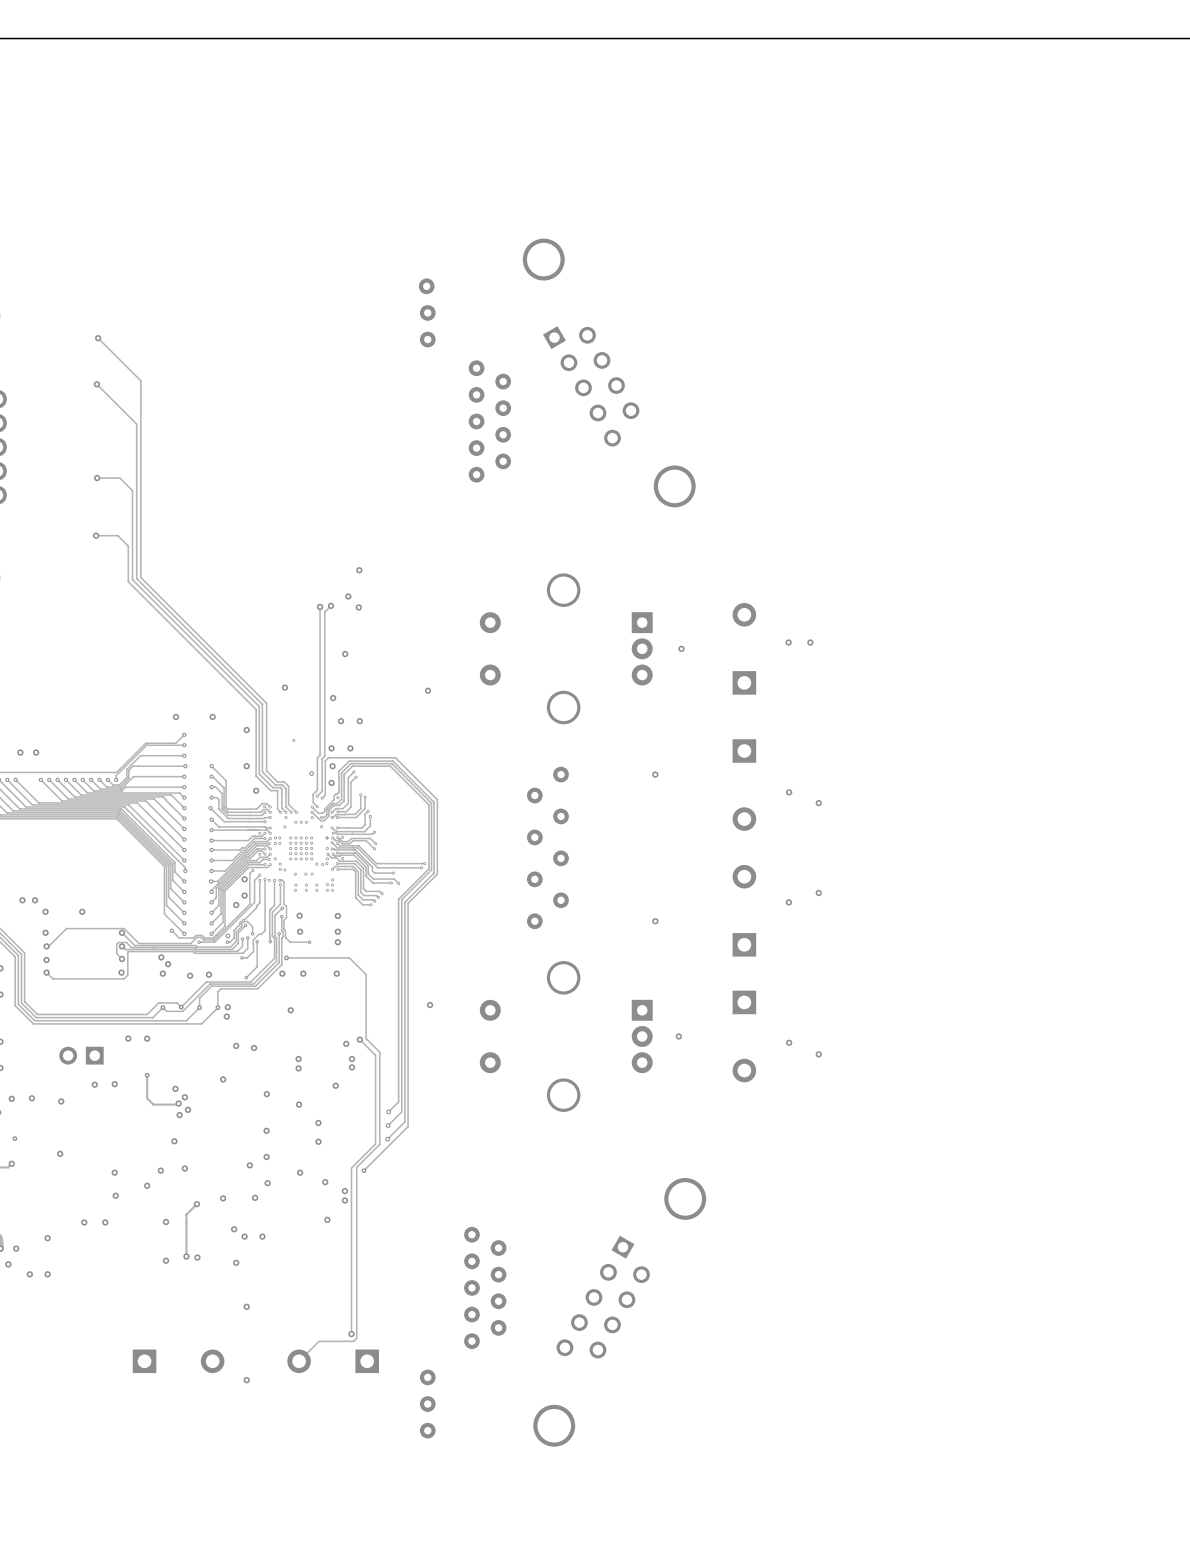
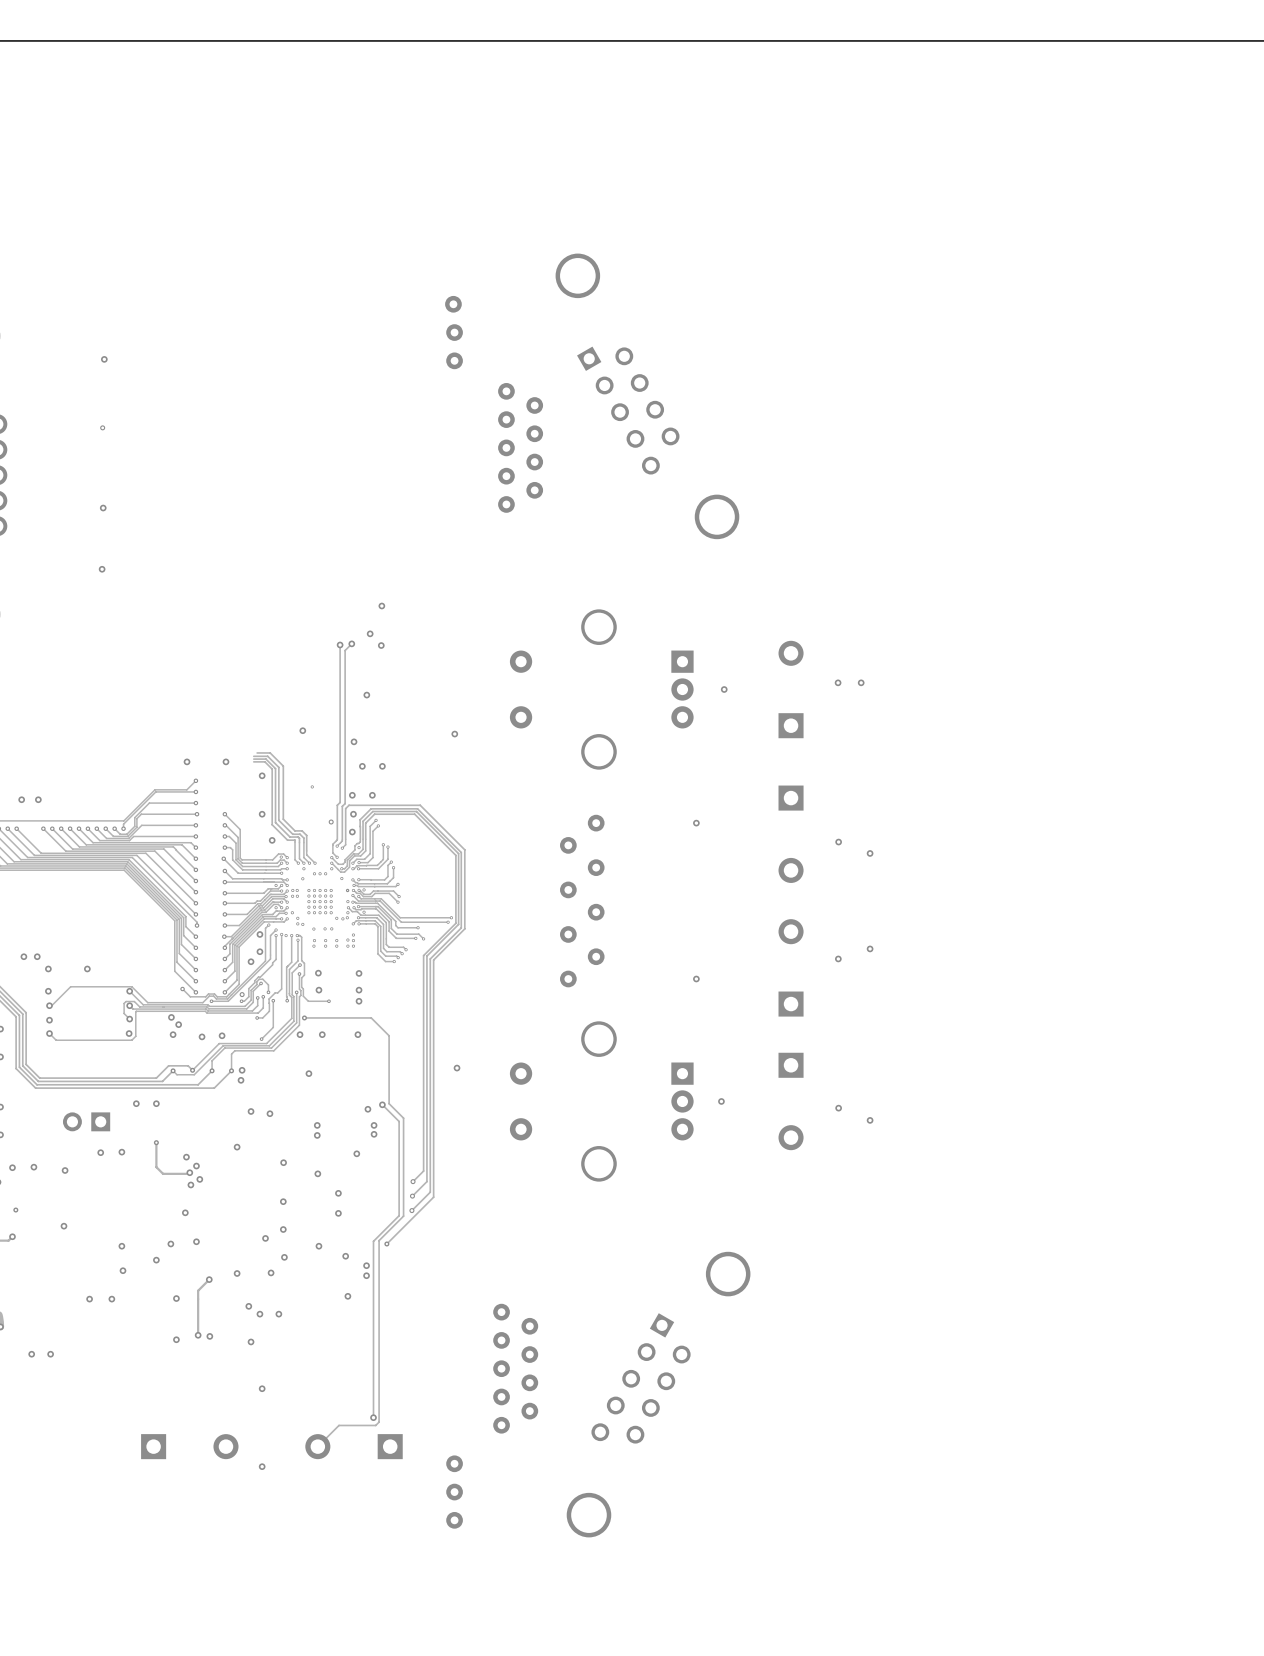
track: (98, 338) (140, 380) (140, 577) (266, 703) (266, 720) -> (257, 752) (270, 752) (283, 766)
track: (96, 384) (136, 424) (136, 578) (262, 704) (262, 722) -> (253, 756) (267, 756) (278, 767)
via: (96, 384) -> none
via: none -> (102, 427)
track: (97, 478) (119, 478) (132, 490) (132, 579) (259, 706) (259, 723) -> (253, 759) (265, 759) (275, 768)
track: (96, 535) (117, 535) (128, 546) (128, 581) (256, 709) (256, 723) -> (253, 761) (264, 761) (272, 769)
via: (47, 1238) -> none
via: (16, 1248) -> none
via: (8, 1264) -> none

